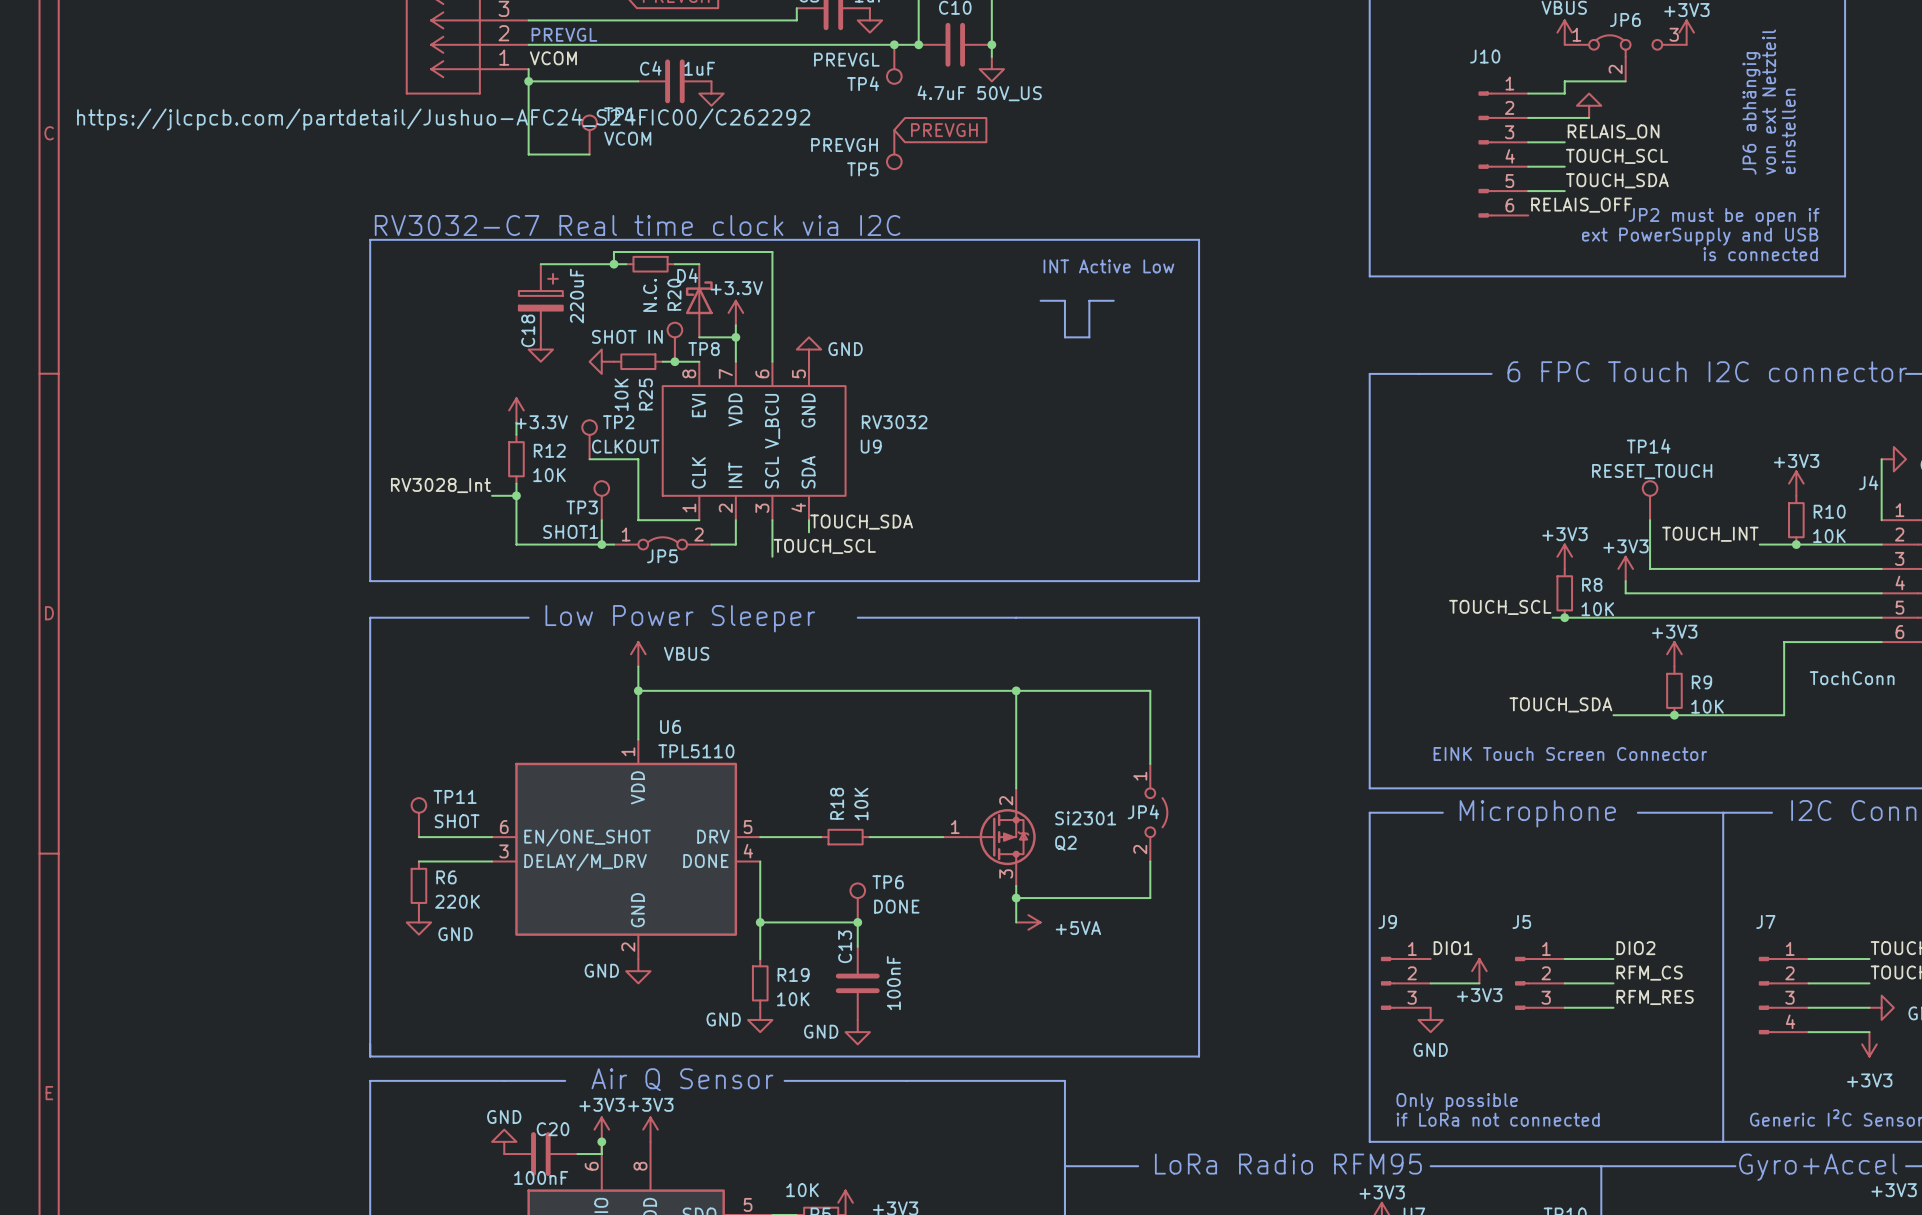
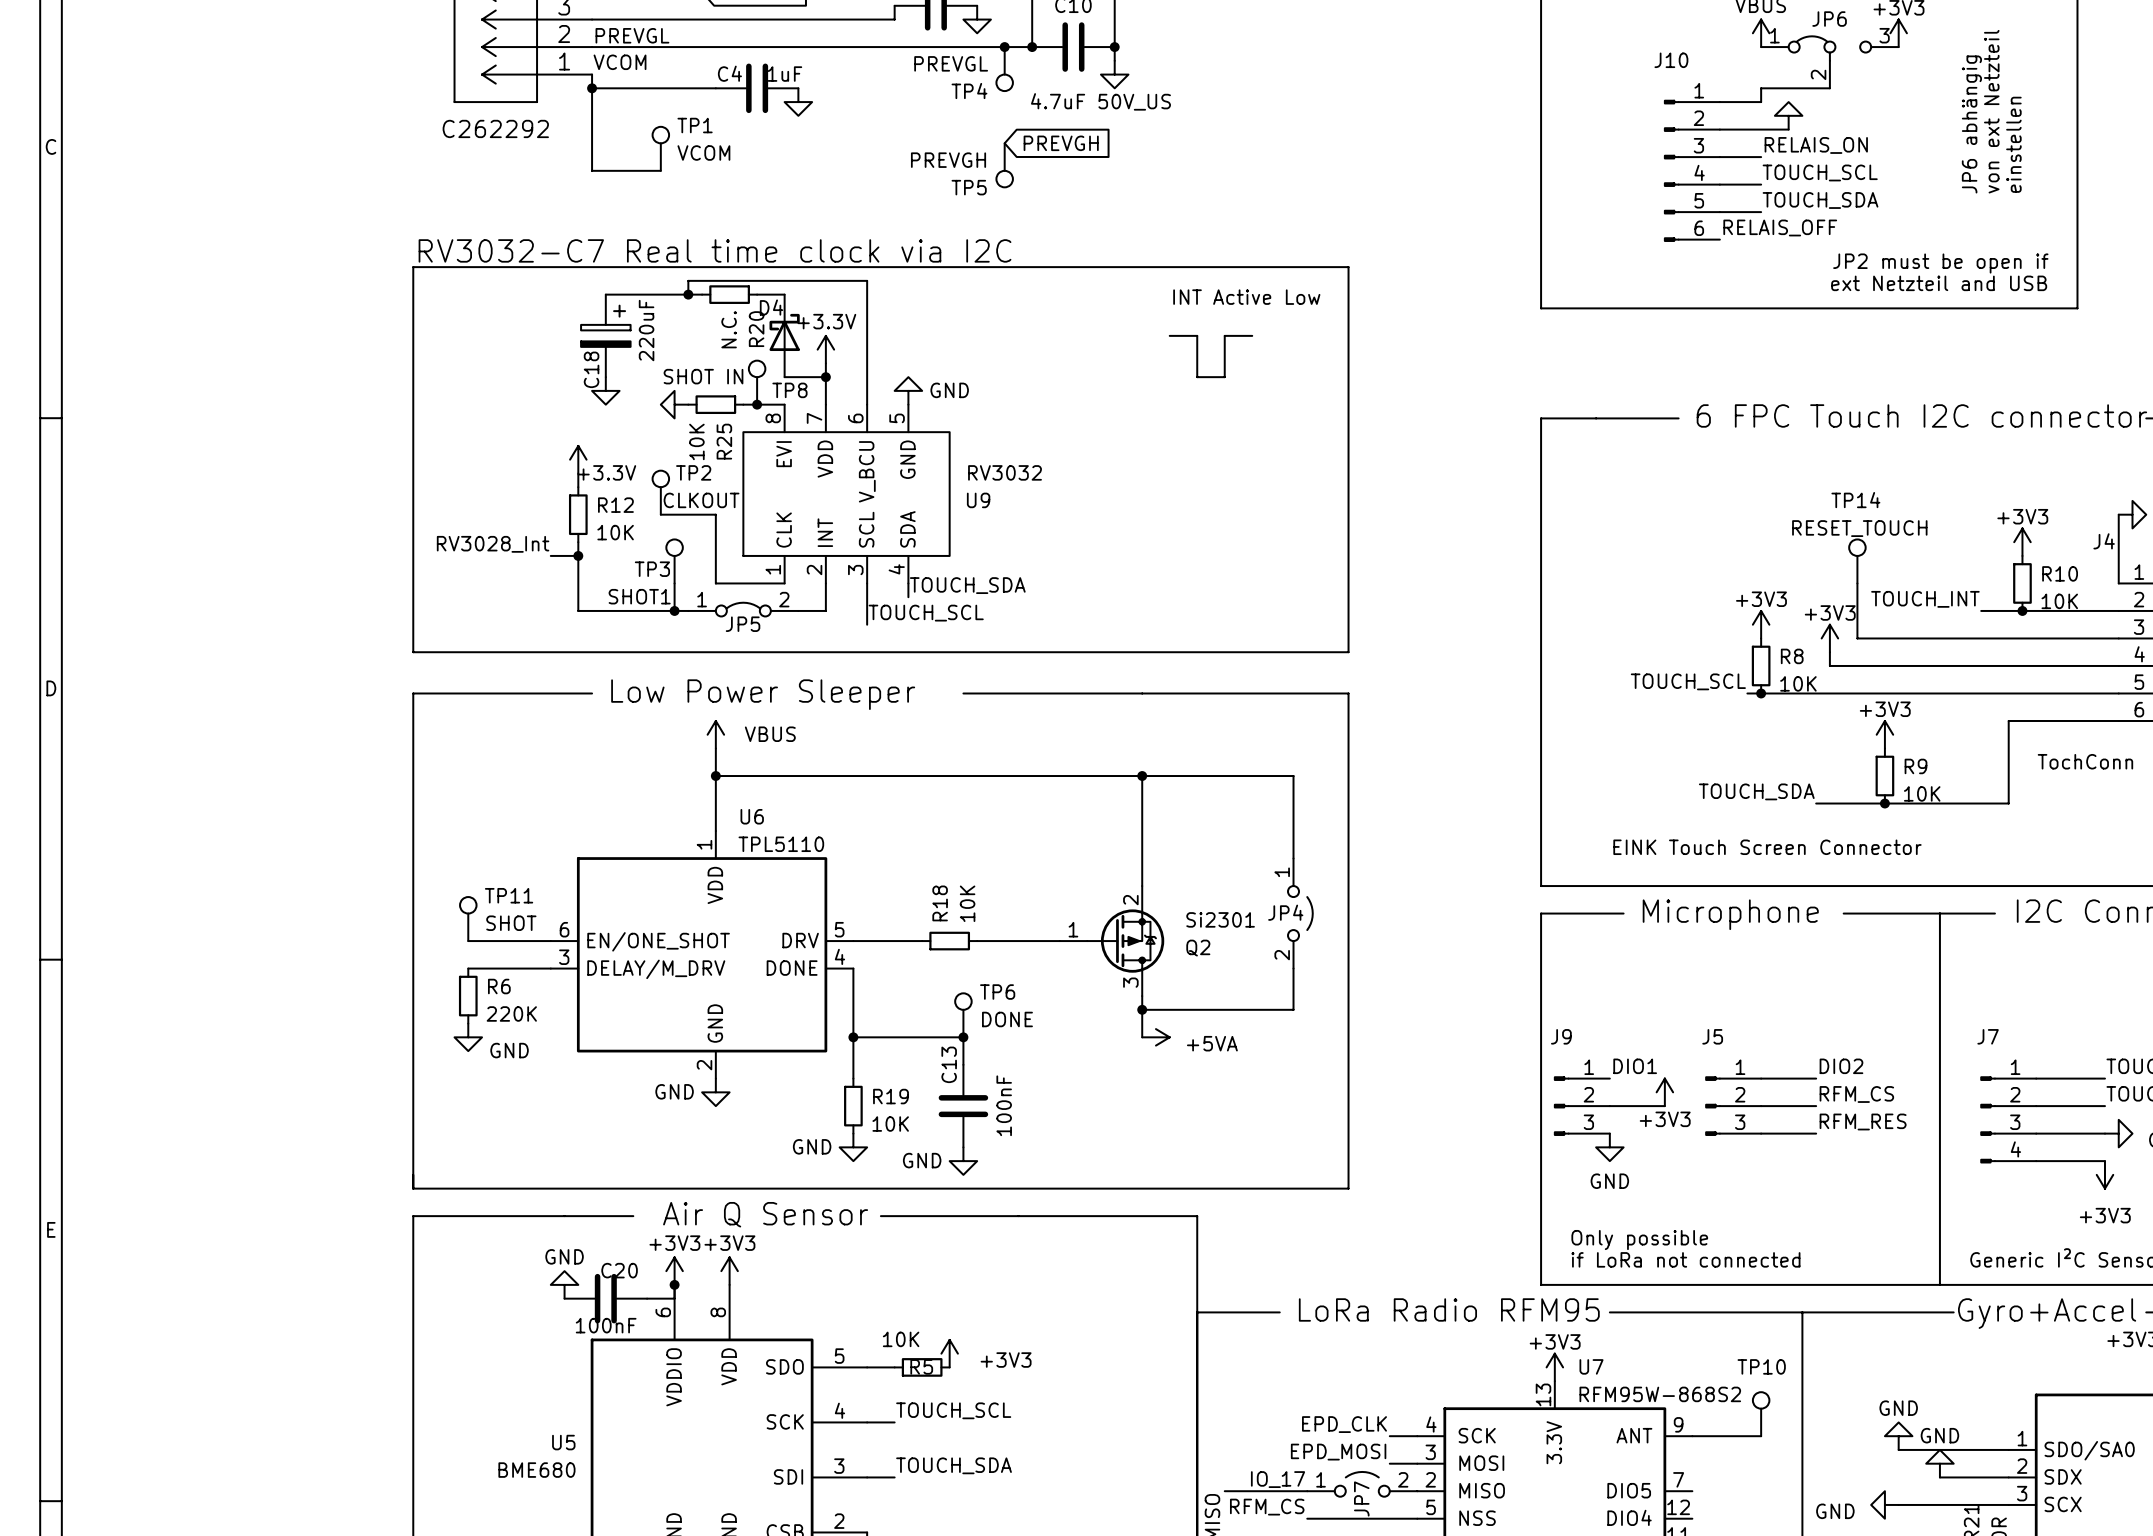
part text: https://jlcpcb.com/partdetail/Jushuo-AFC24_S24FIC00/C262292 (443, 119) -> C262292 (495, 128)
text: JP2 must be open if (1723, 217) -> none
text: ext PowerSupply and USB (1700, 236) -> JP2 must be open if (1940, 263)
text: is connected (1760, 254) -> ext Netzteil and USB (1939, 283)

